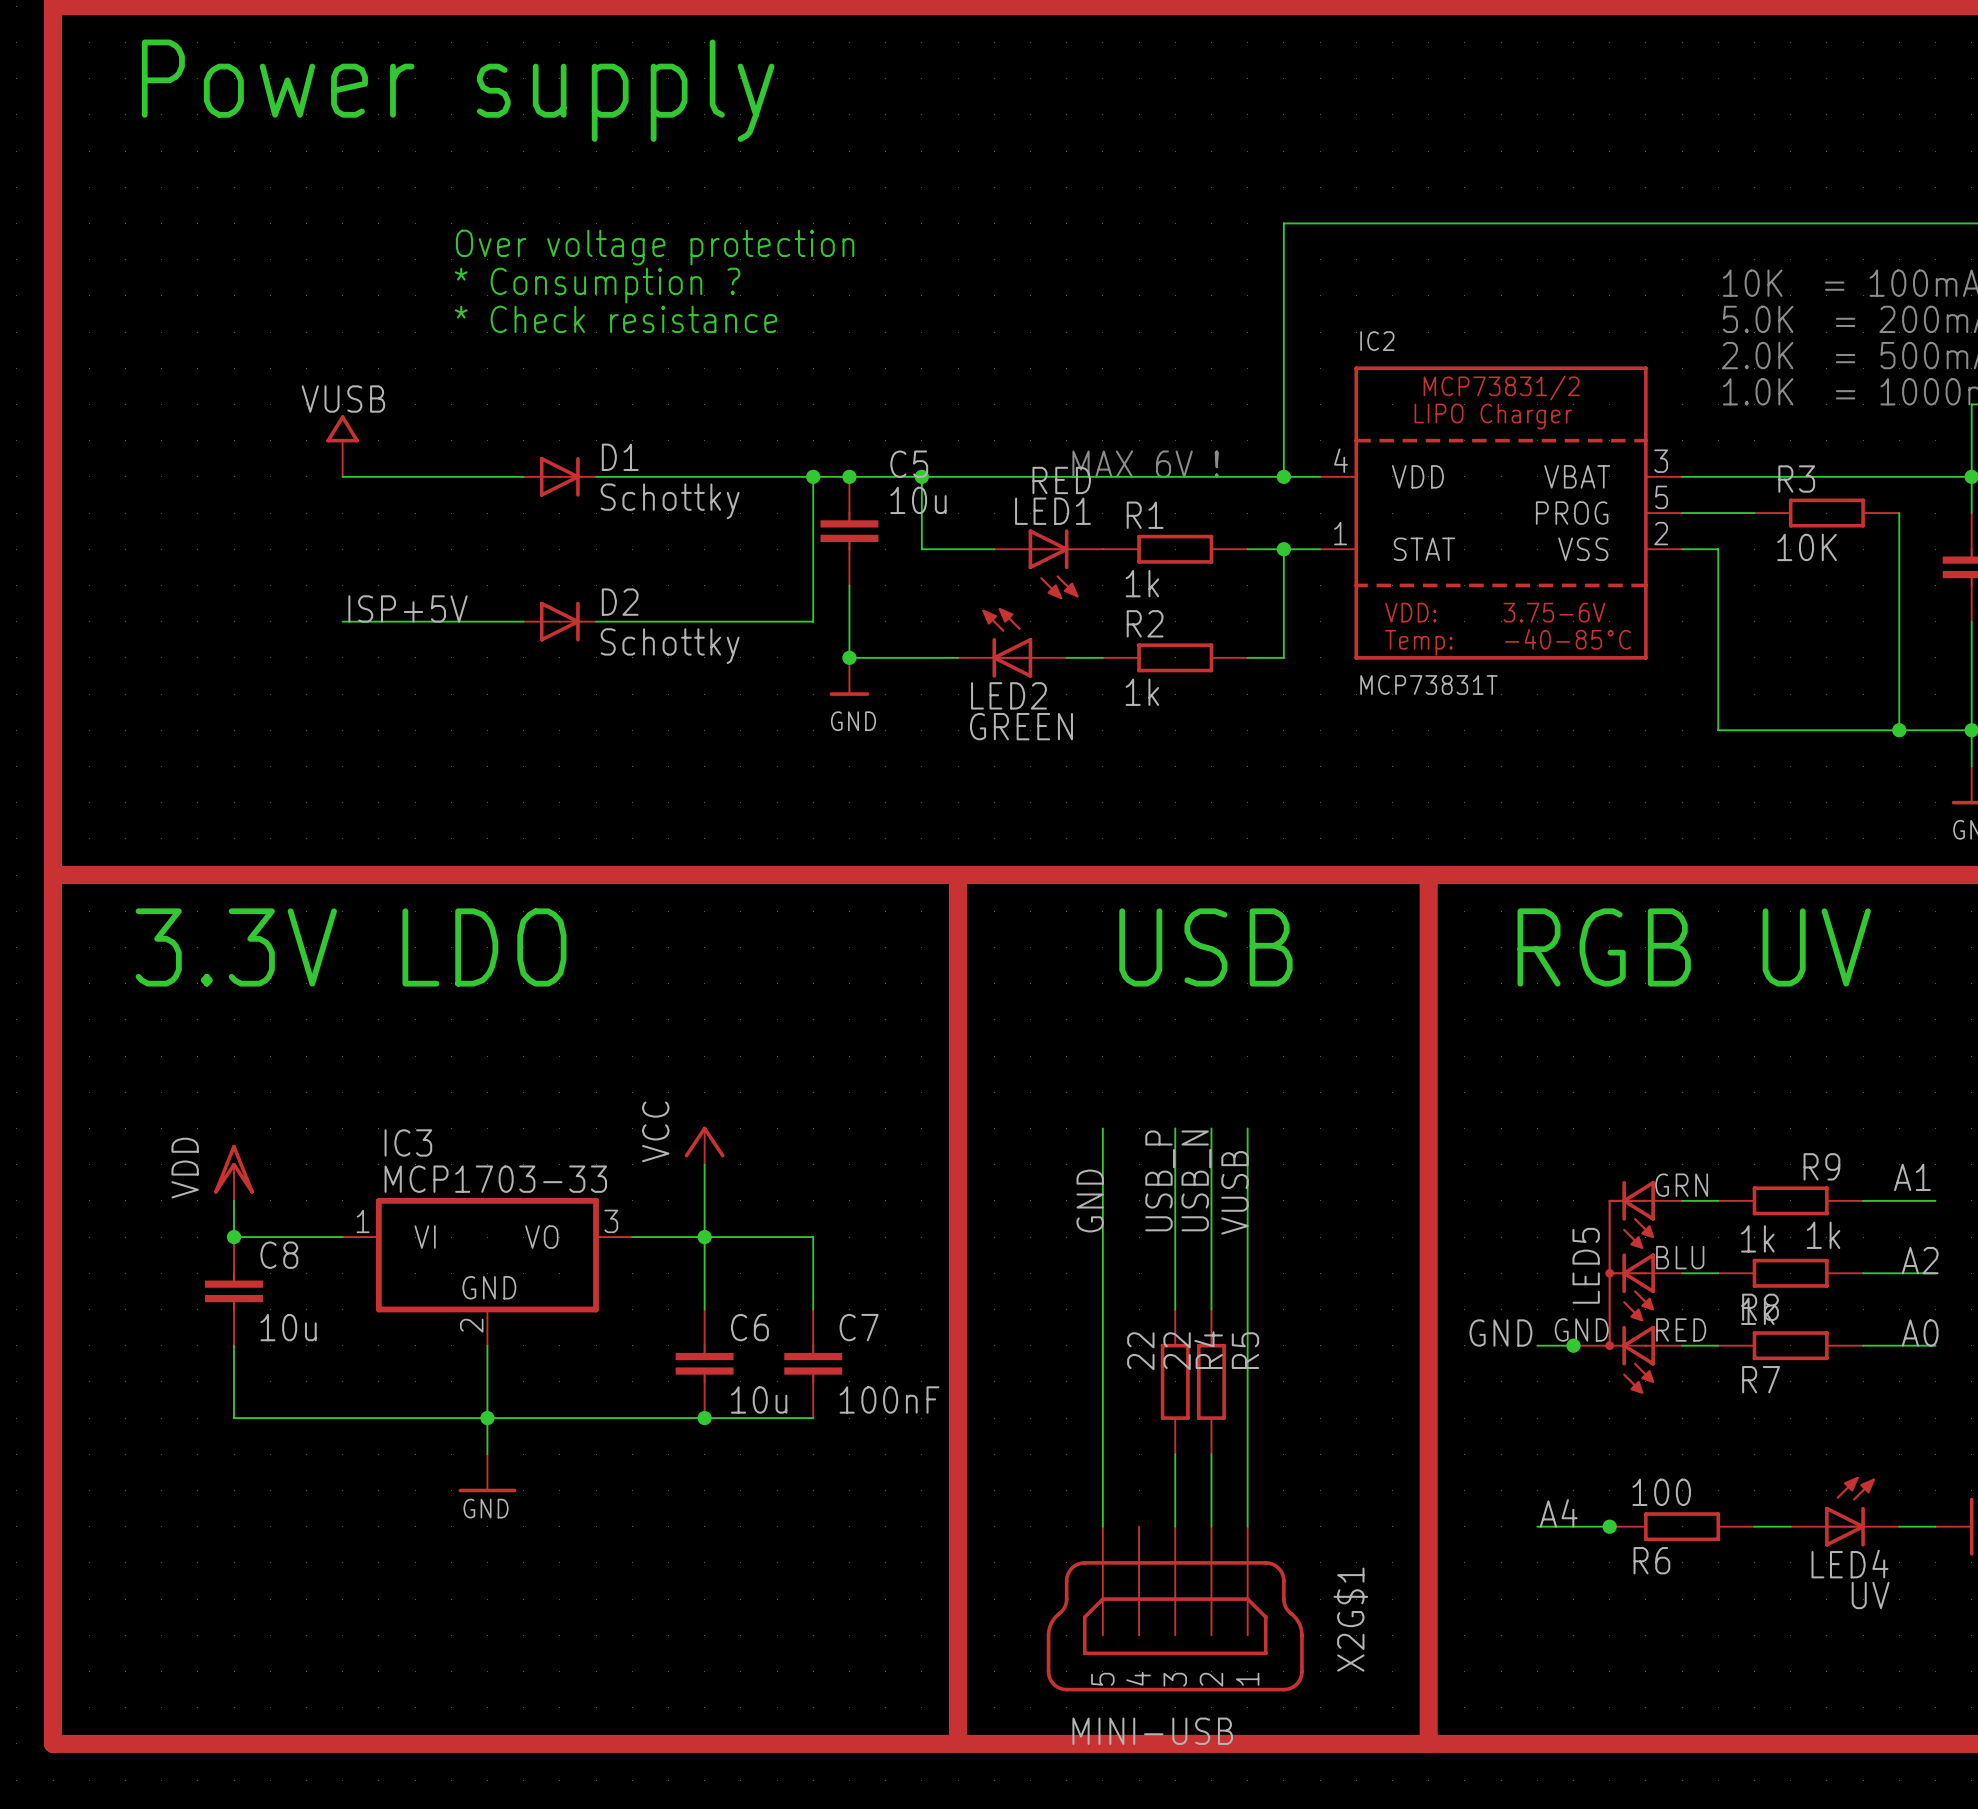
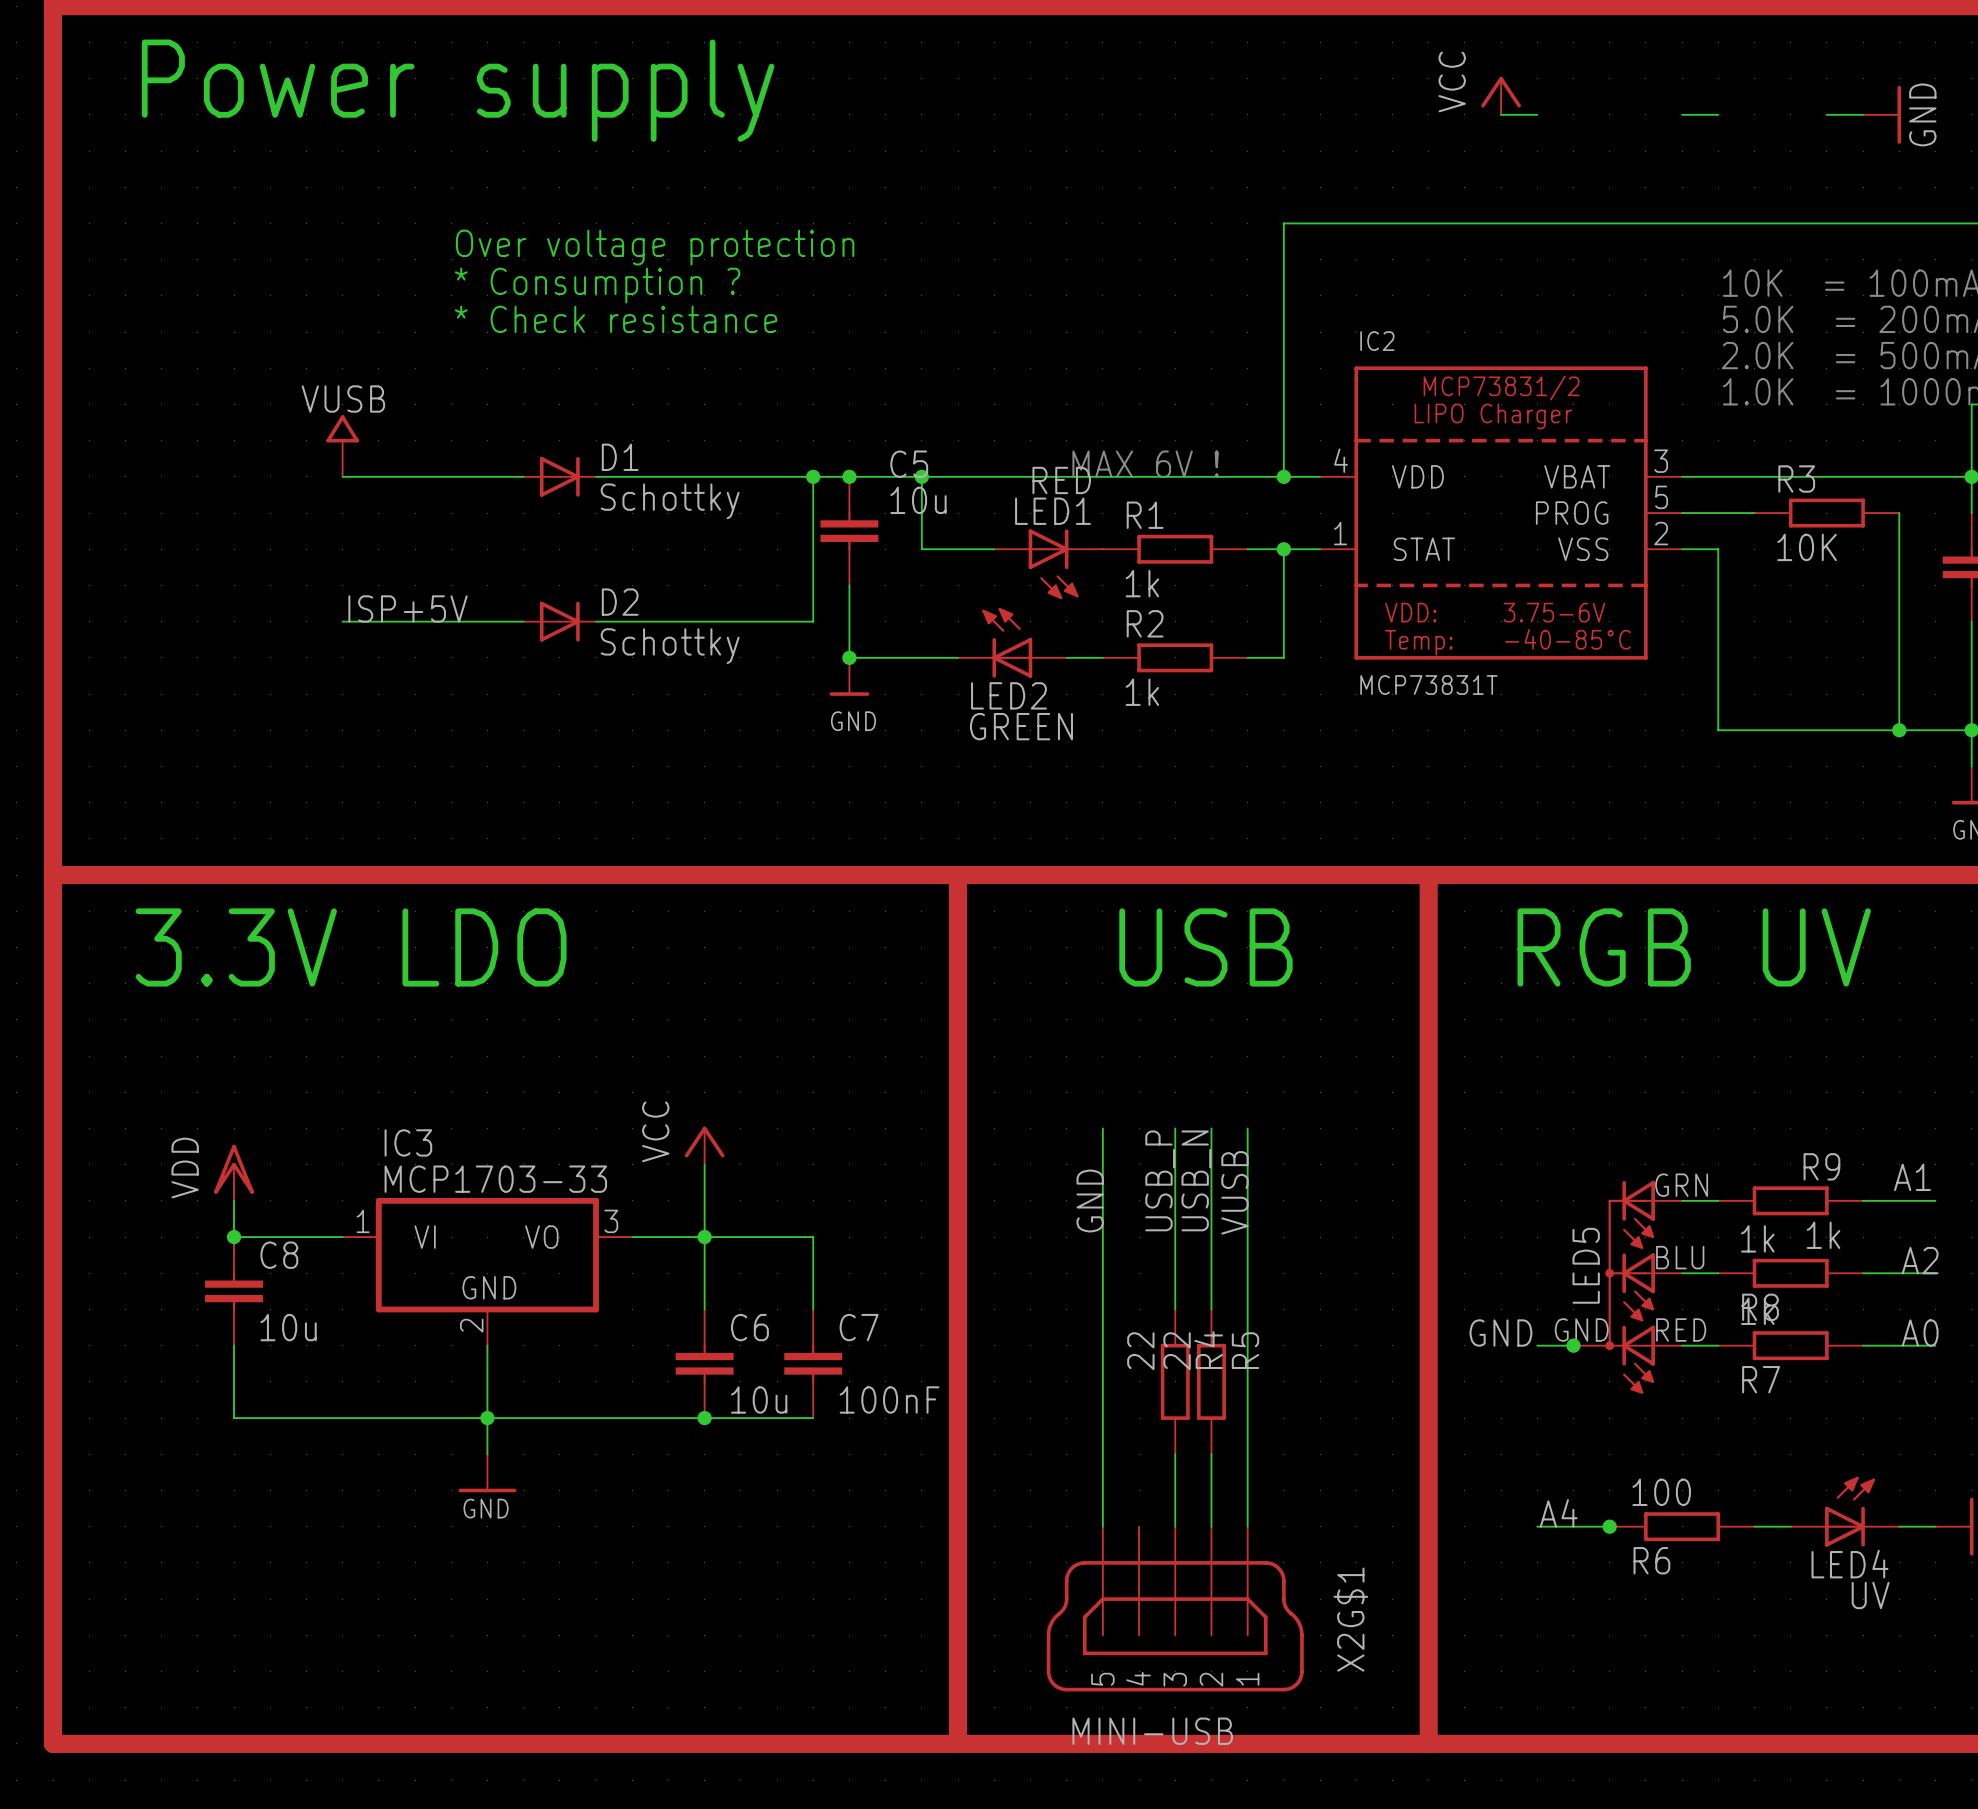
power symbol: none -> VCC (1501, 95)
wire: none -> (1501, 114) (1537, 114)
wire: none -> (1682, 114) (1718, 114)
wire: none -> (1826, 114) (1863, 114)
power symbol: none -> GND (1882, 114)

